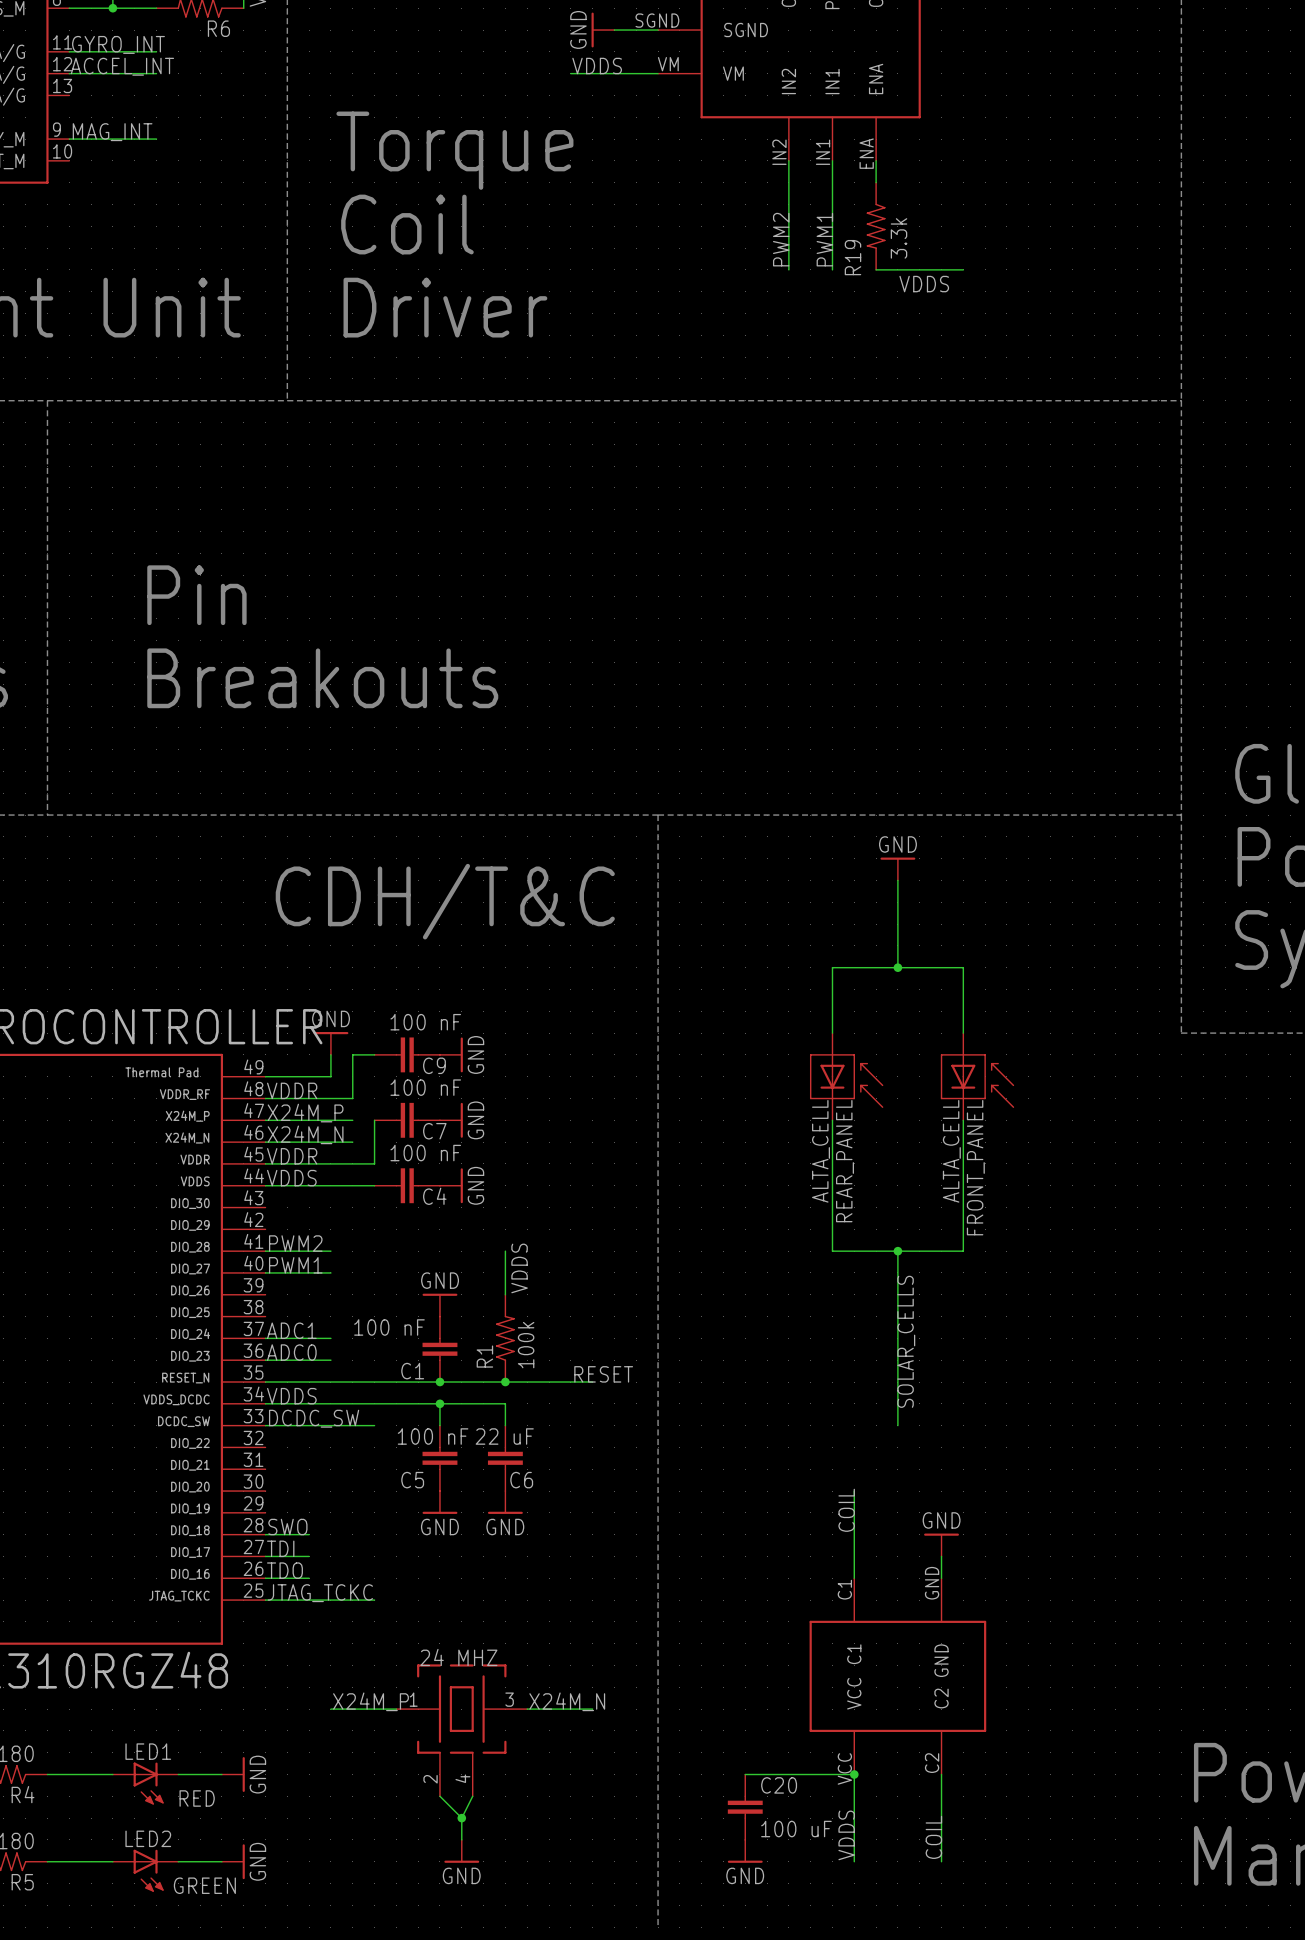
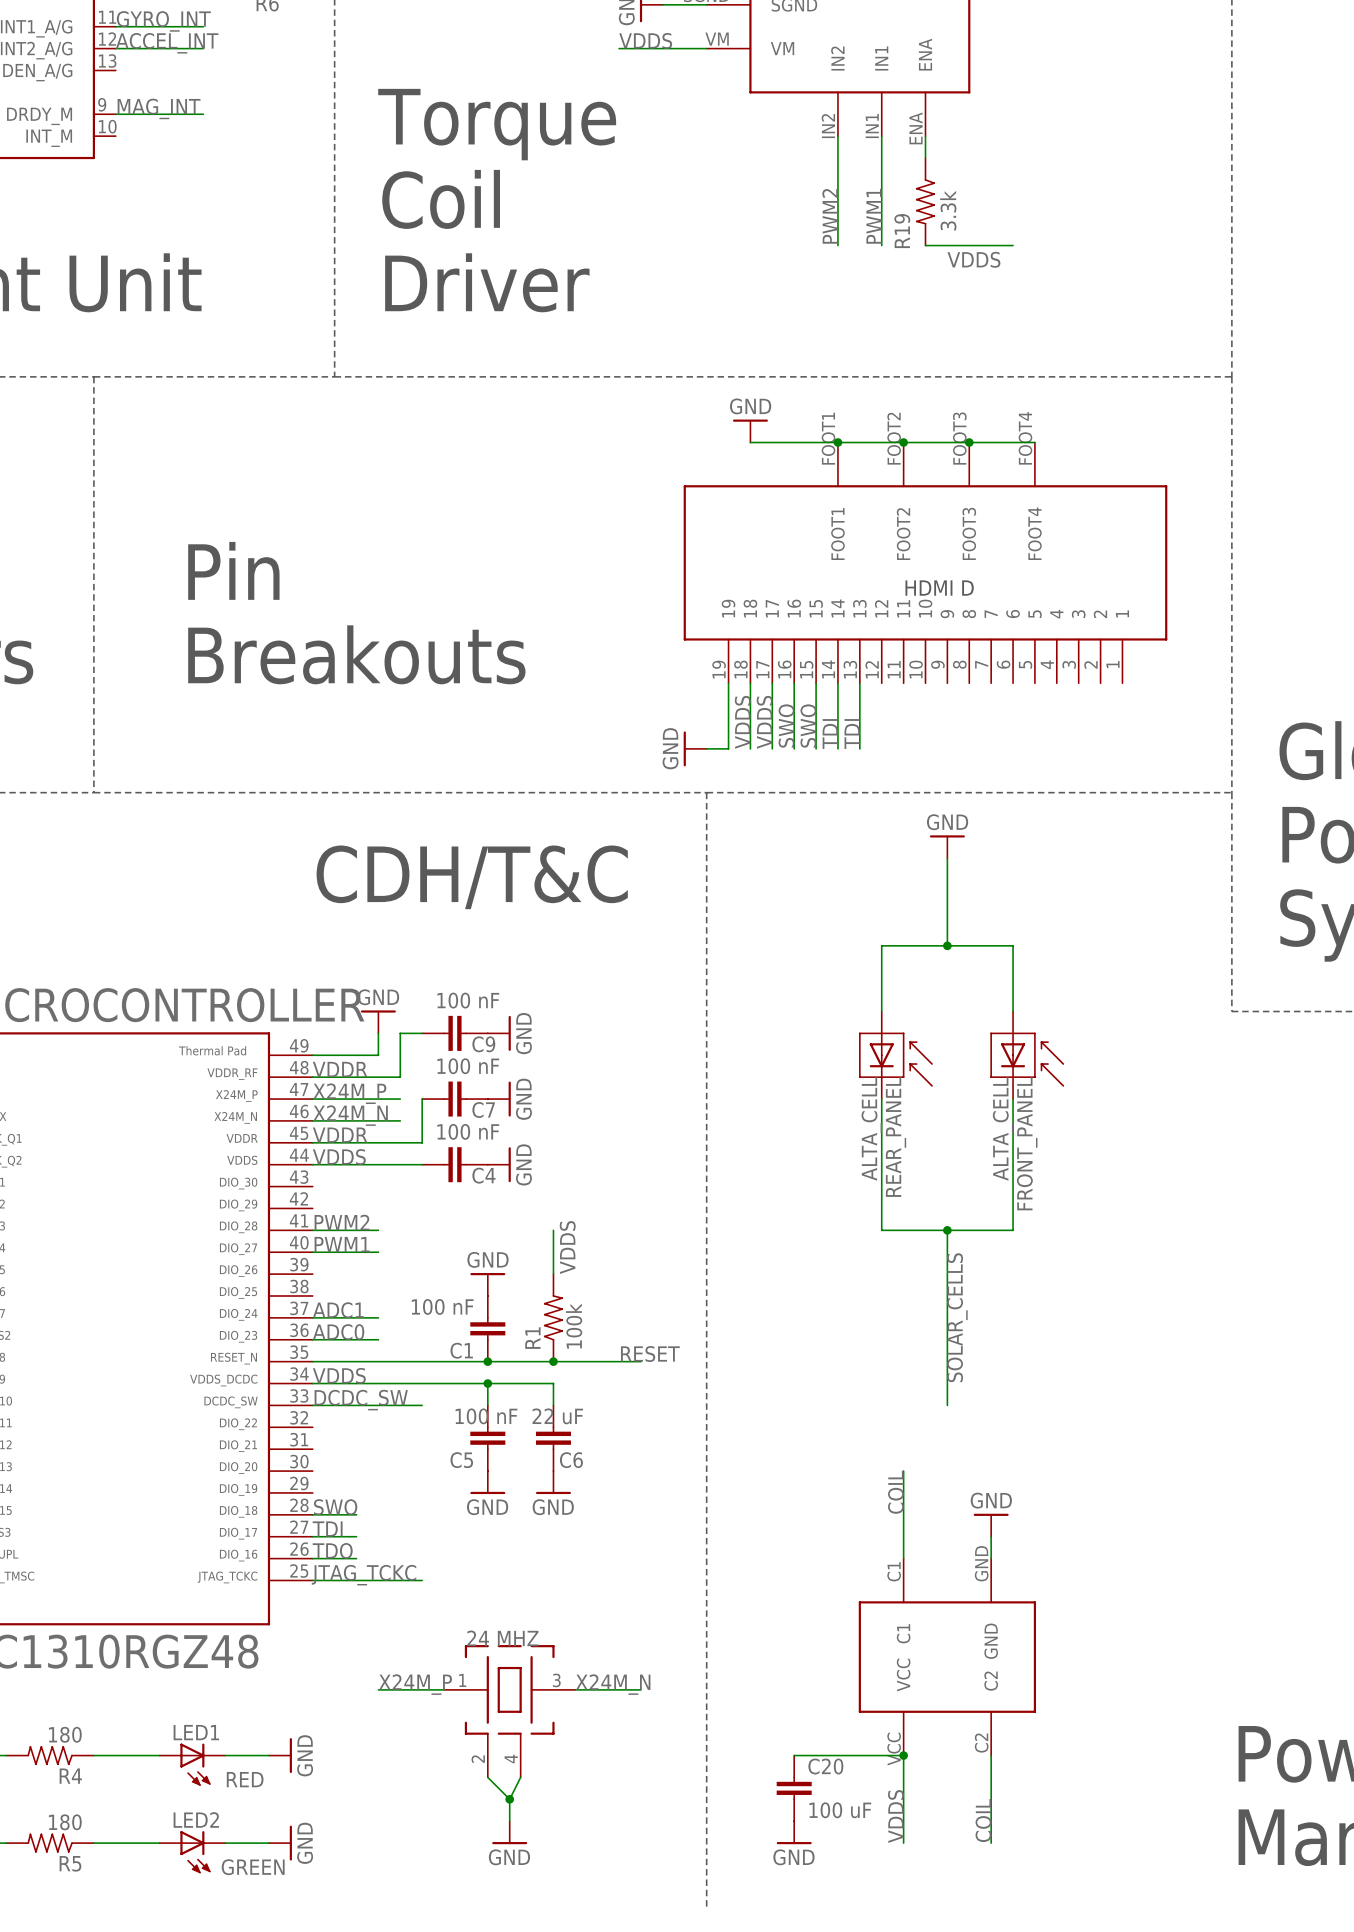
power symbol: none -> GND (750, 431)
wire: none -> (750, 442) (1034, 442)
junction: none -> (837, 442)
junction: none -> (903, 442)
junction: none -> (969, 442)
part: none -> (925, 562)
wire: none -> (728, 683) (728, 748) (706, 748)
wire: none -> (750, 683) (750, 748)
wire: none -> (772, 683) (772, 748)
wire: none -> (794, 683) (794, 748)
wire: none -> (816, 683) (816, 748)
wire: none -> (837, 683) (837, 748)
wire: none -> (859, 683) (859, 748)
label: none -> VDDS (742, 722)
label: none -> VDDS (764, 722)
label: none -> SWO (786, 726)
label: none -> SWO (808, 726)
label: none -> TDI (830, 734)
label: none -> TDI (852, 734)
power symbol: none -> GND (695, 748)

